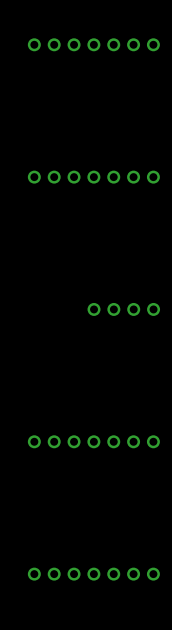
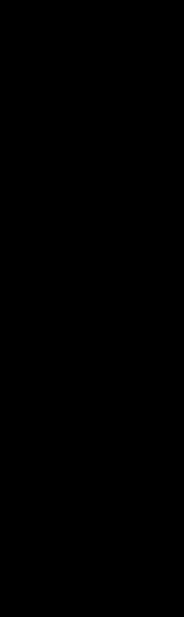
part: (93, 44) -> none
part: (93, 177) -> none
part: (123, 309) -> none
part: (93, 441) -> none
part: (93, 574) -> none

